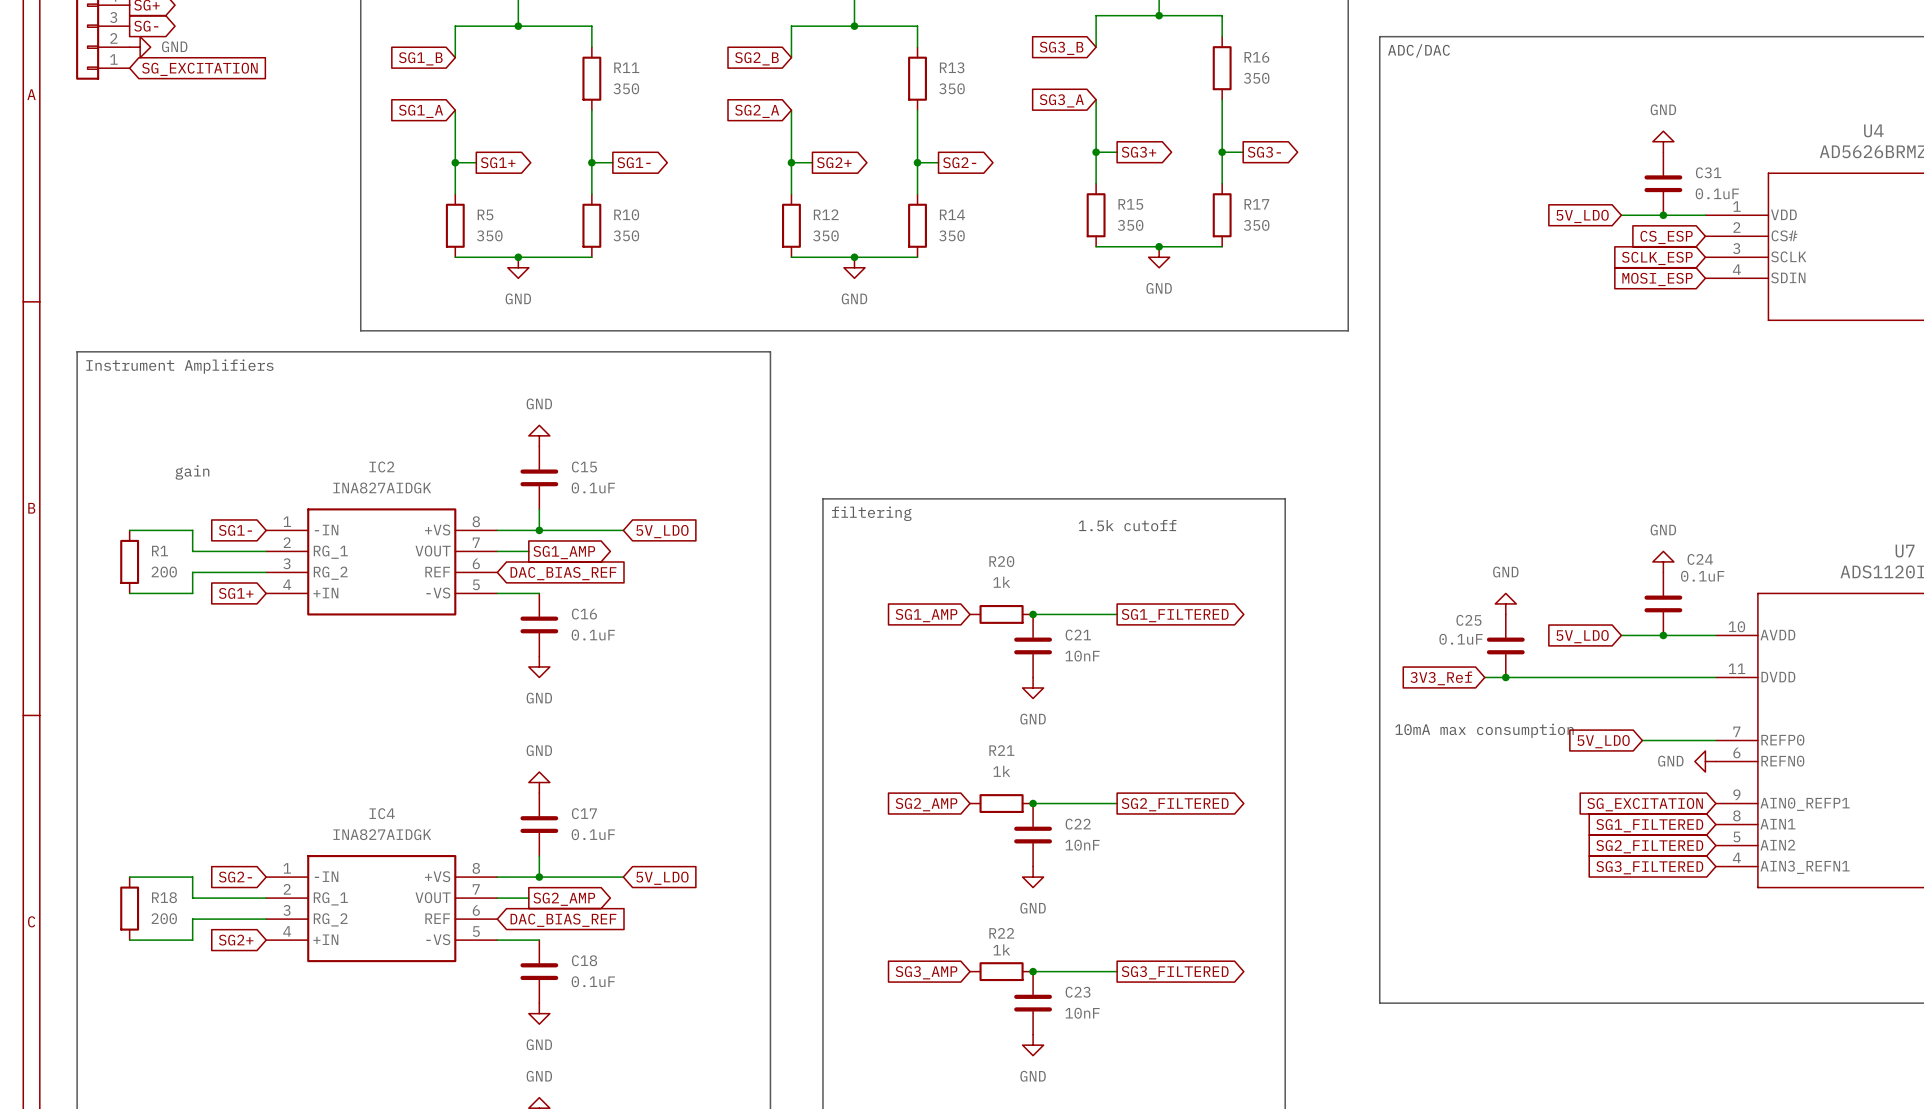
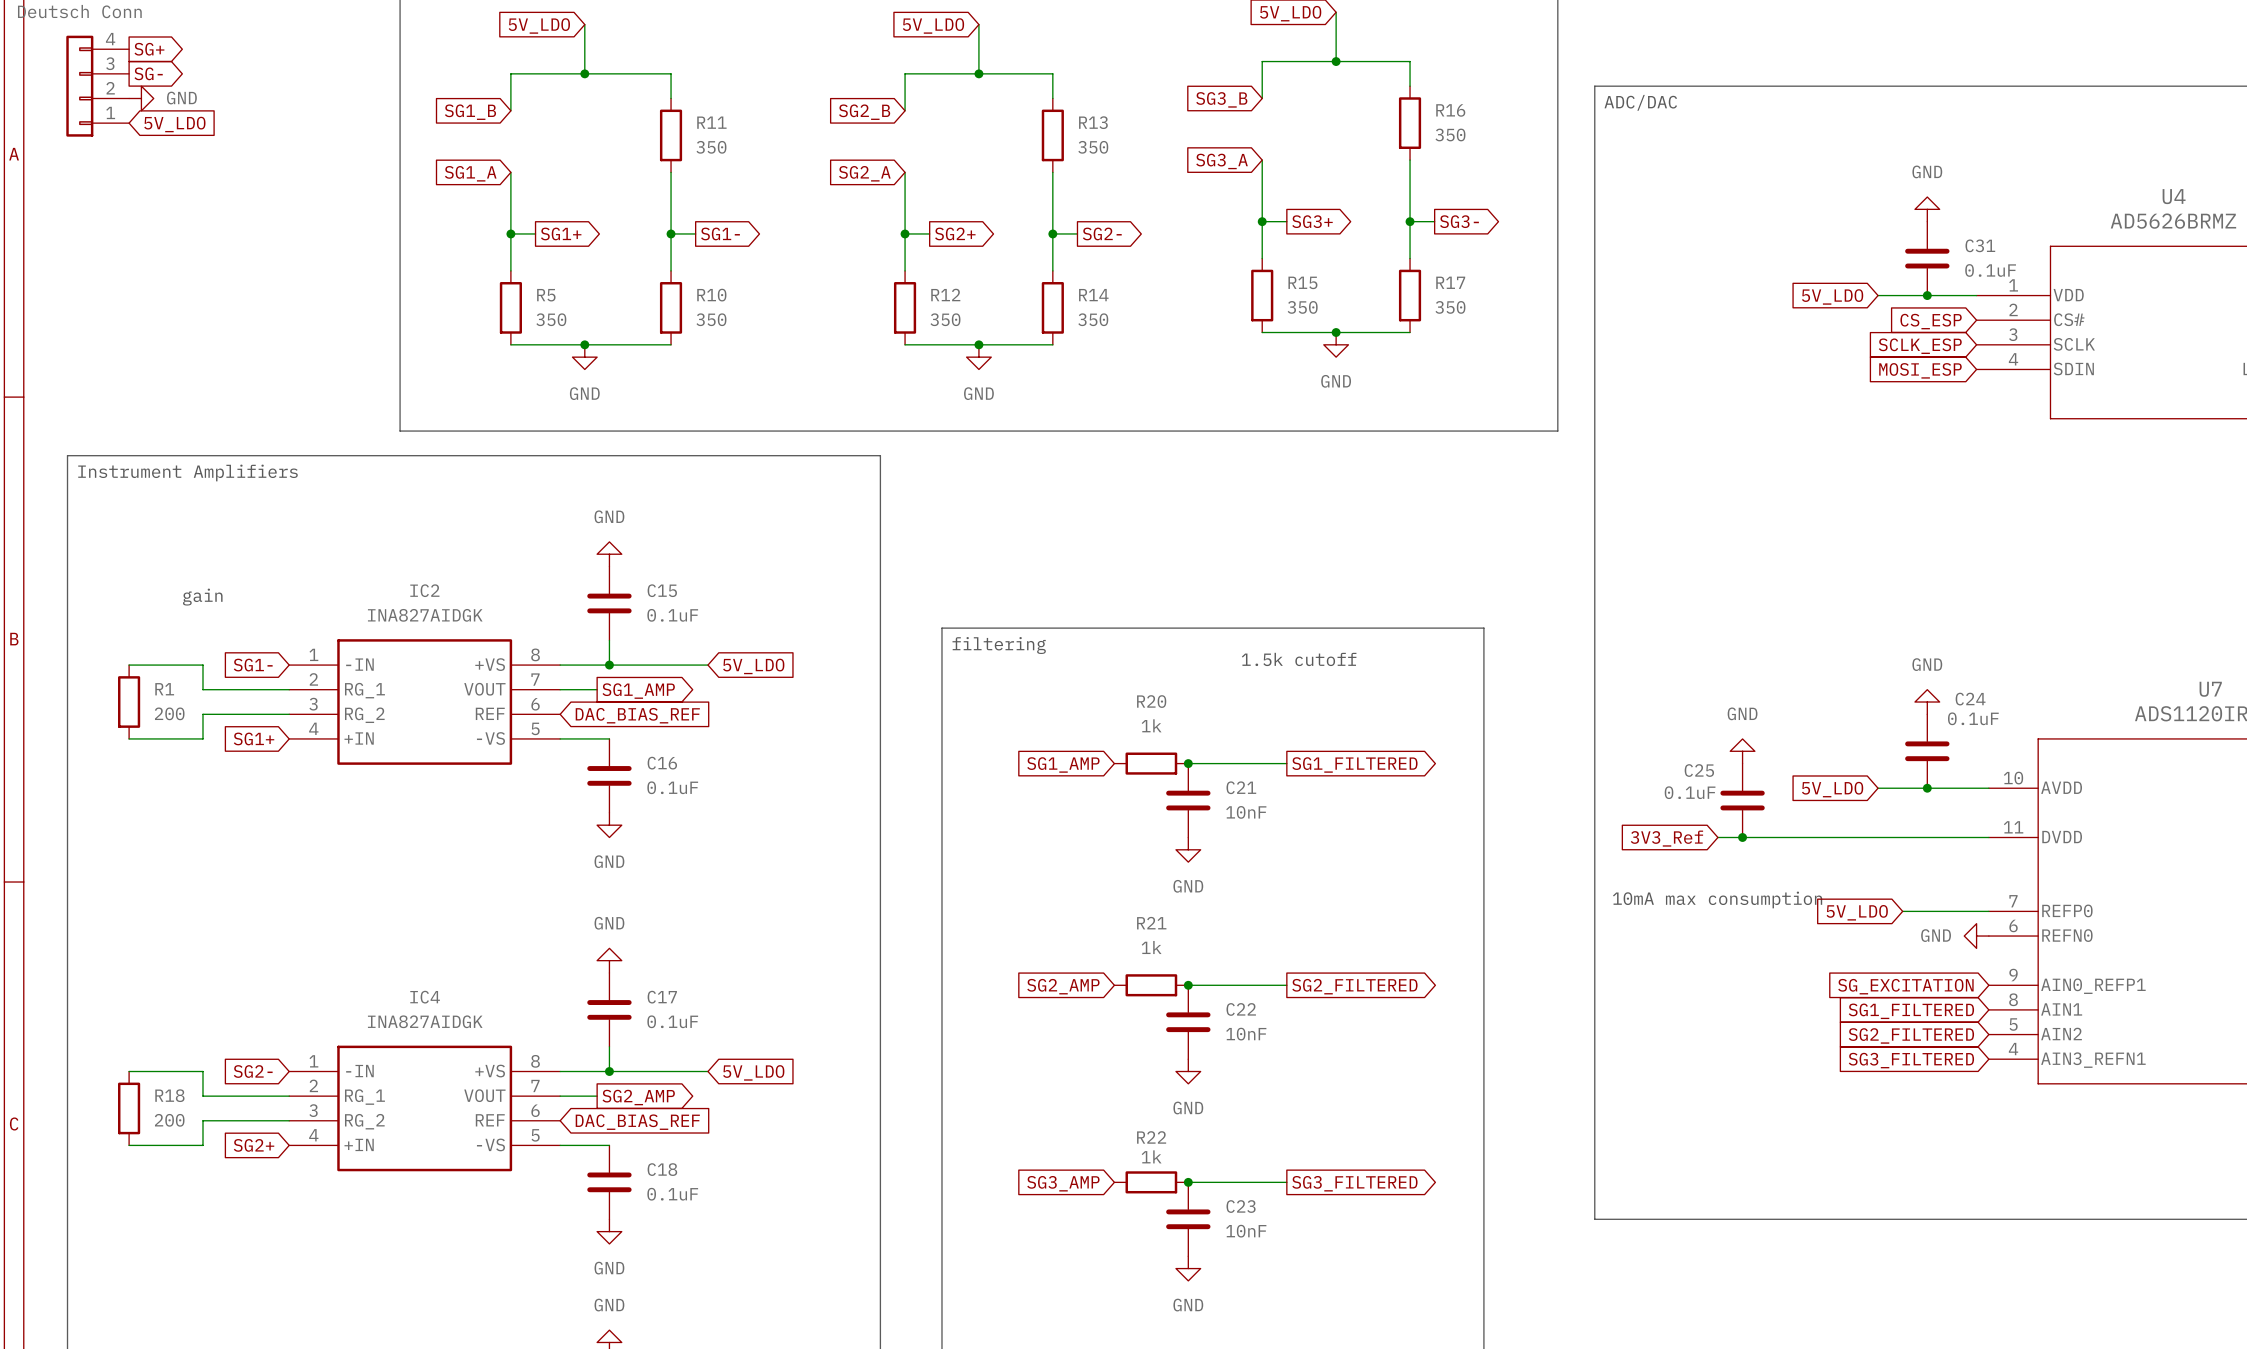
global label: SG_EXCITATION (199, 69) -> 5V_LDO (174, 124)

